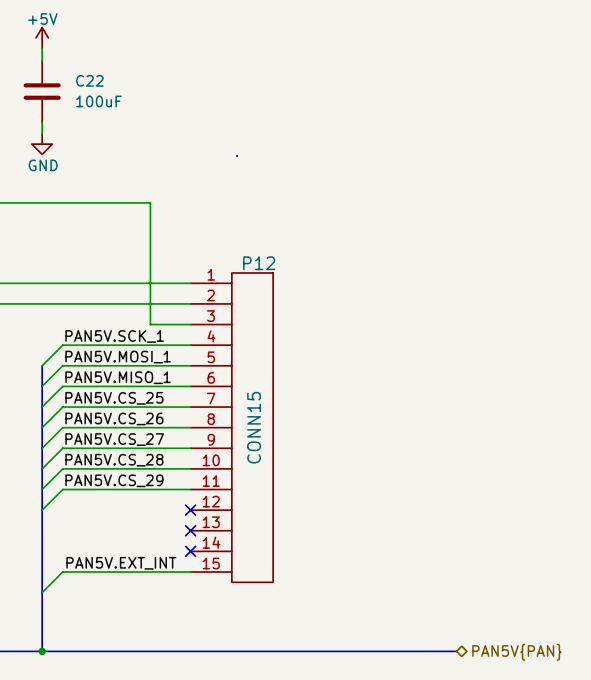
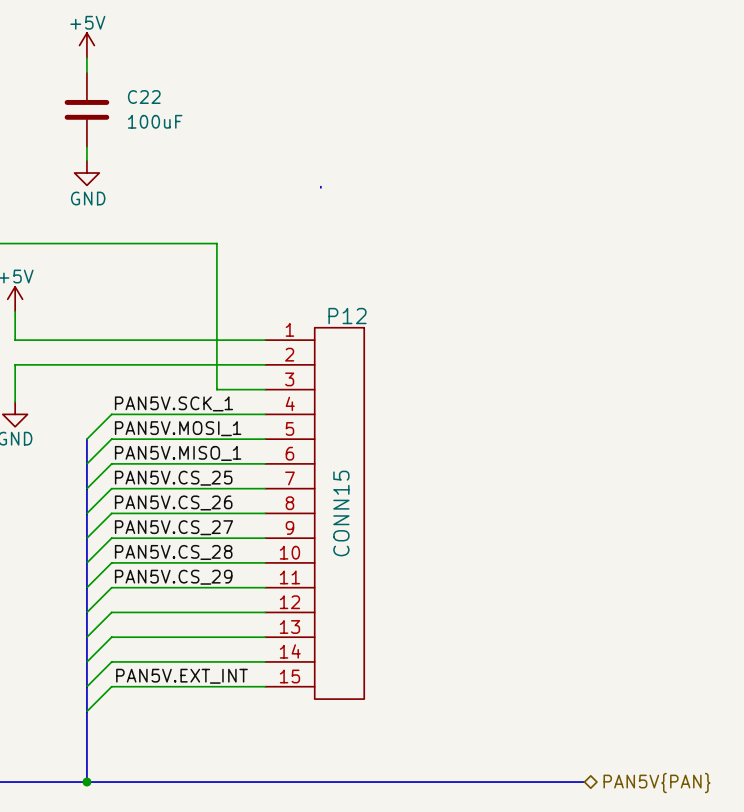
wire: none -> (265, 612) (111, 612) (86, 637)
no-connect mark: (190, 510) -> none
wire: none -> (265, 637) (111, 637) (86, 661)
no-connect mark: (190, 530) -> none
wire: none -> (265, 661) (111, 661) (86, 686)
no-connect mark: (190, 551) -> none

